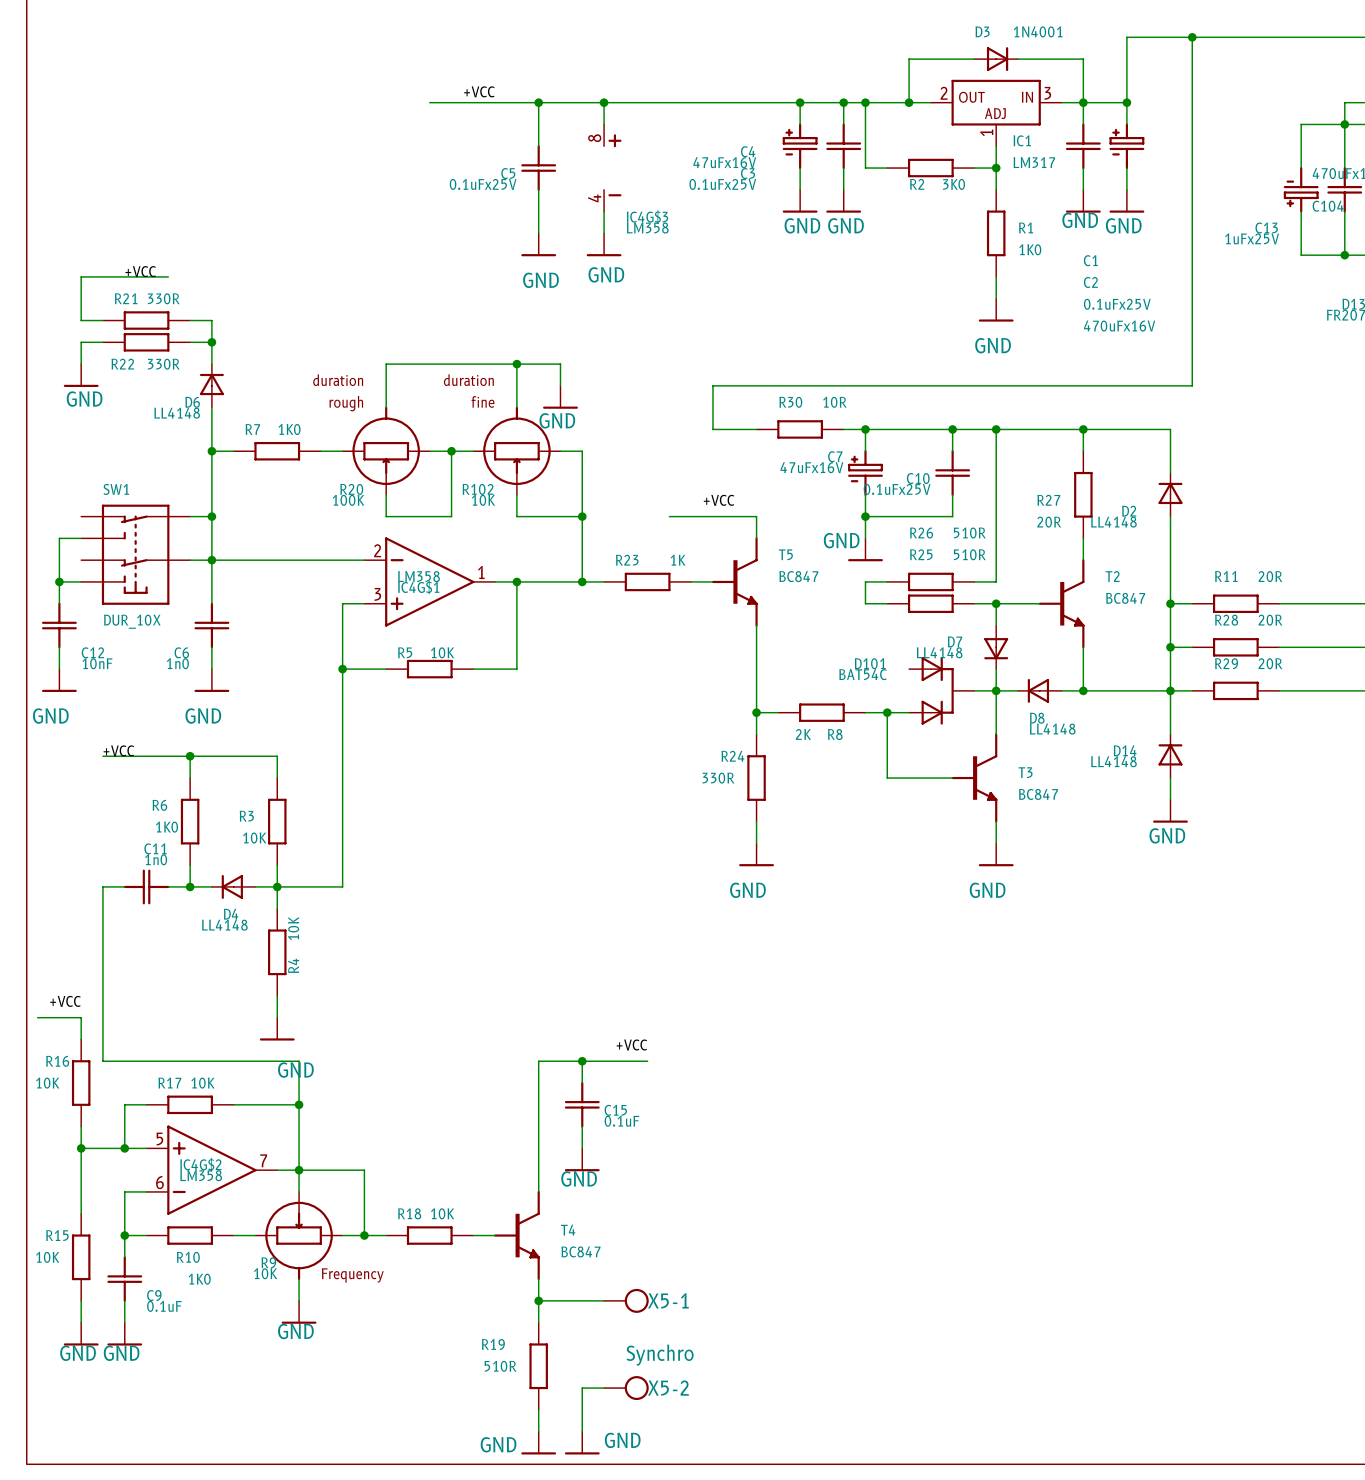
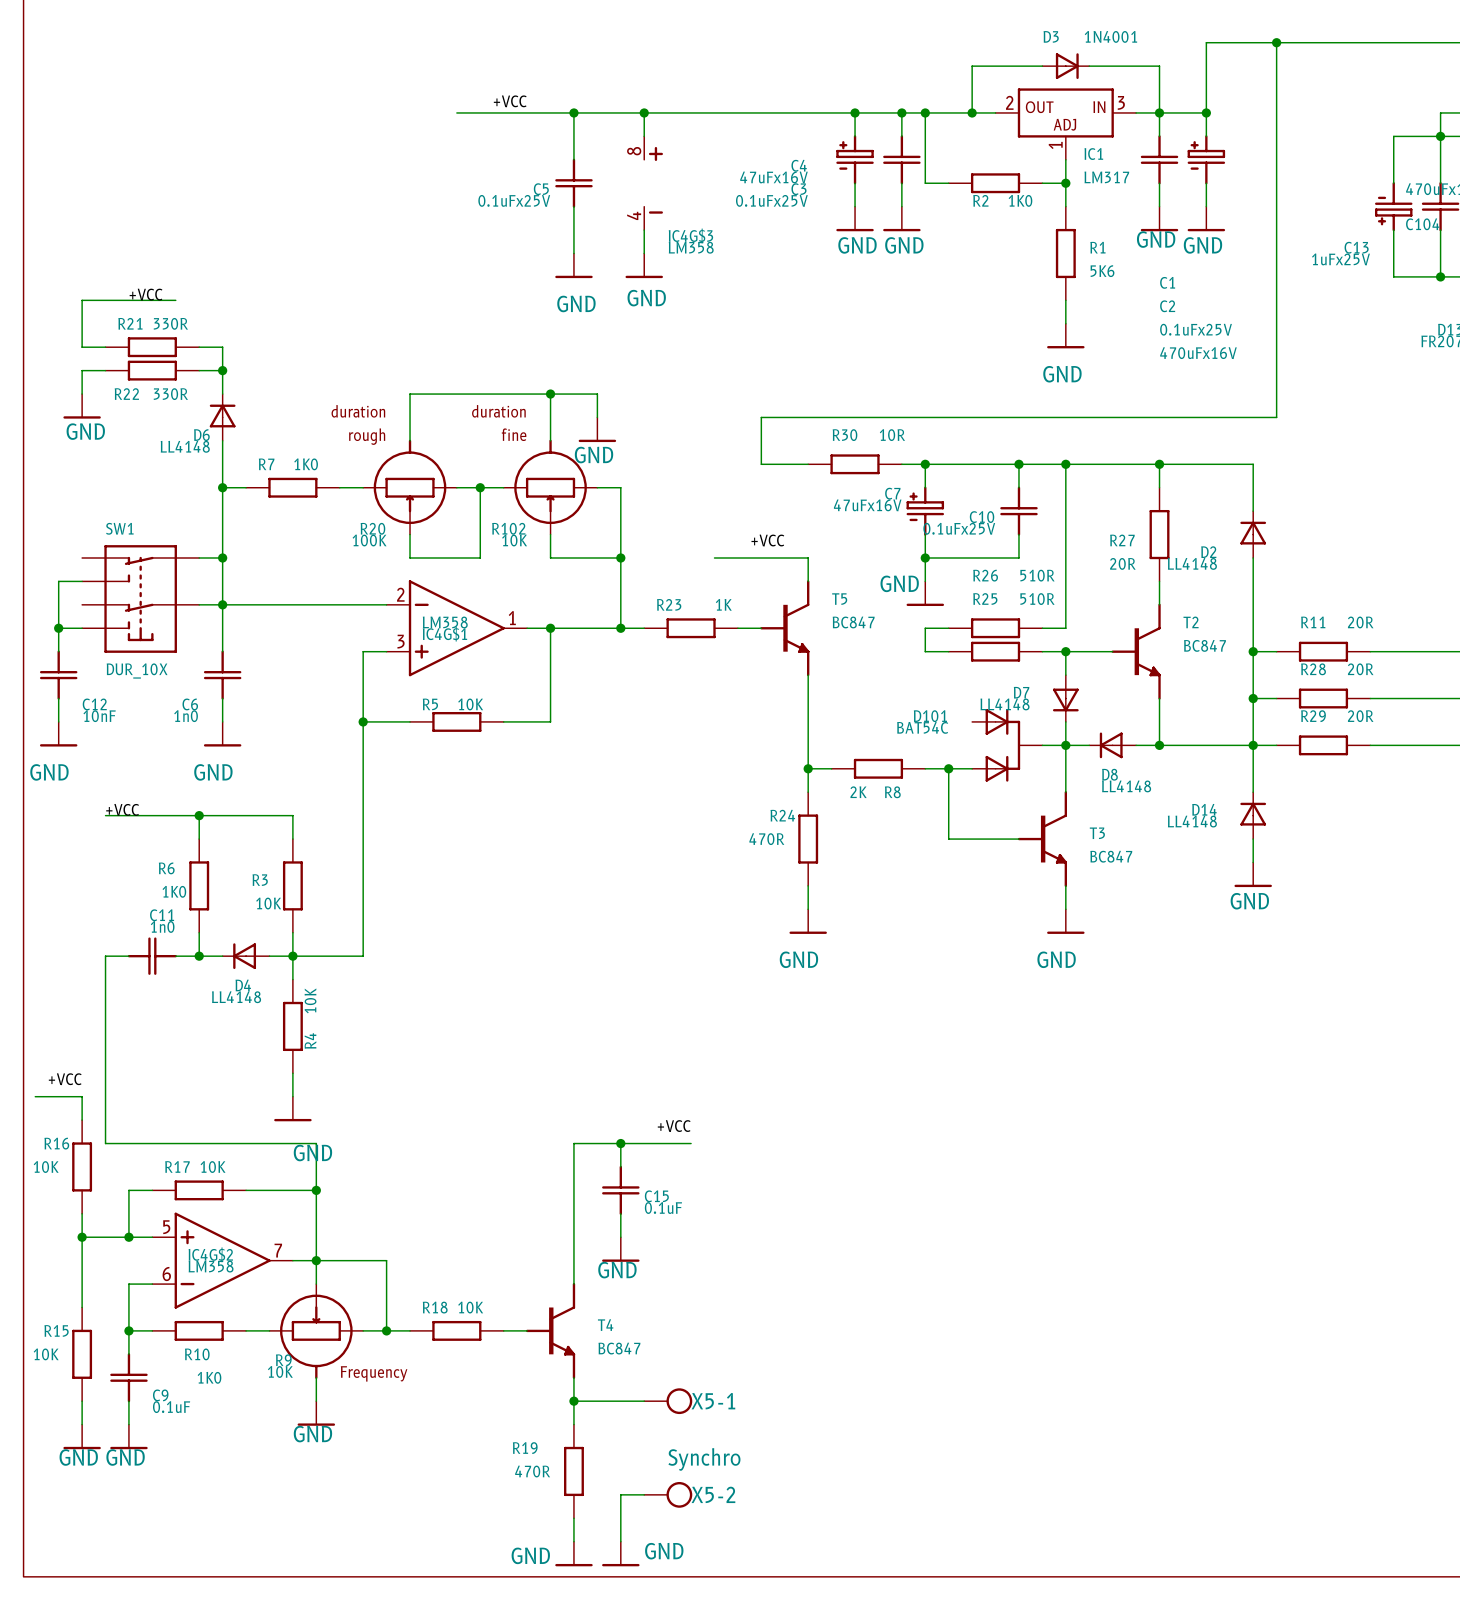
R2 value: 3K0 (954, 184) -> 1K0 (1020, 200)
R1 value: 1K0 (1030, 249) -> 5K6 (1102, 271)
R24 value: 330R (718, 778) -> 470R (766, 839)
R19 value: 510R (500, 1366) -> 470R (532, 1471)

